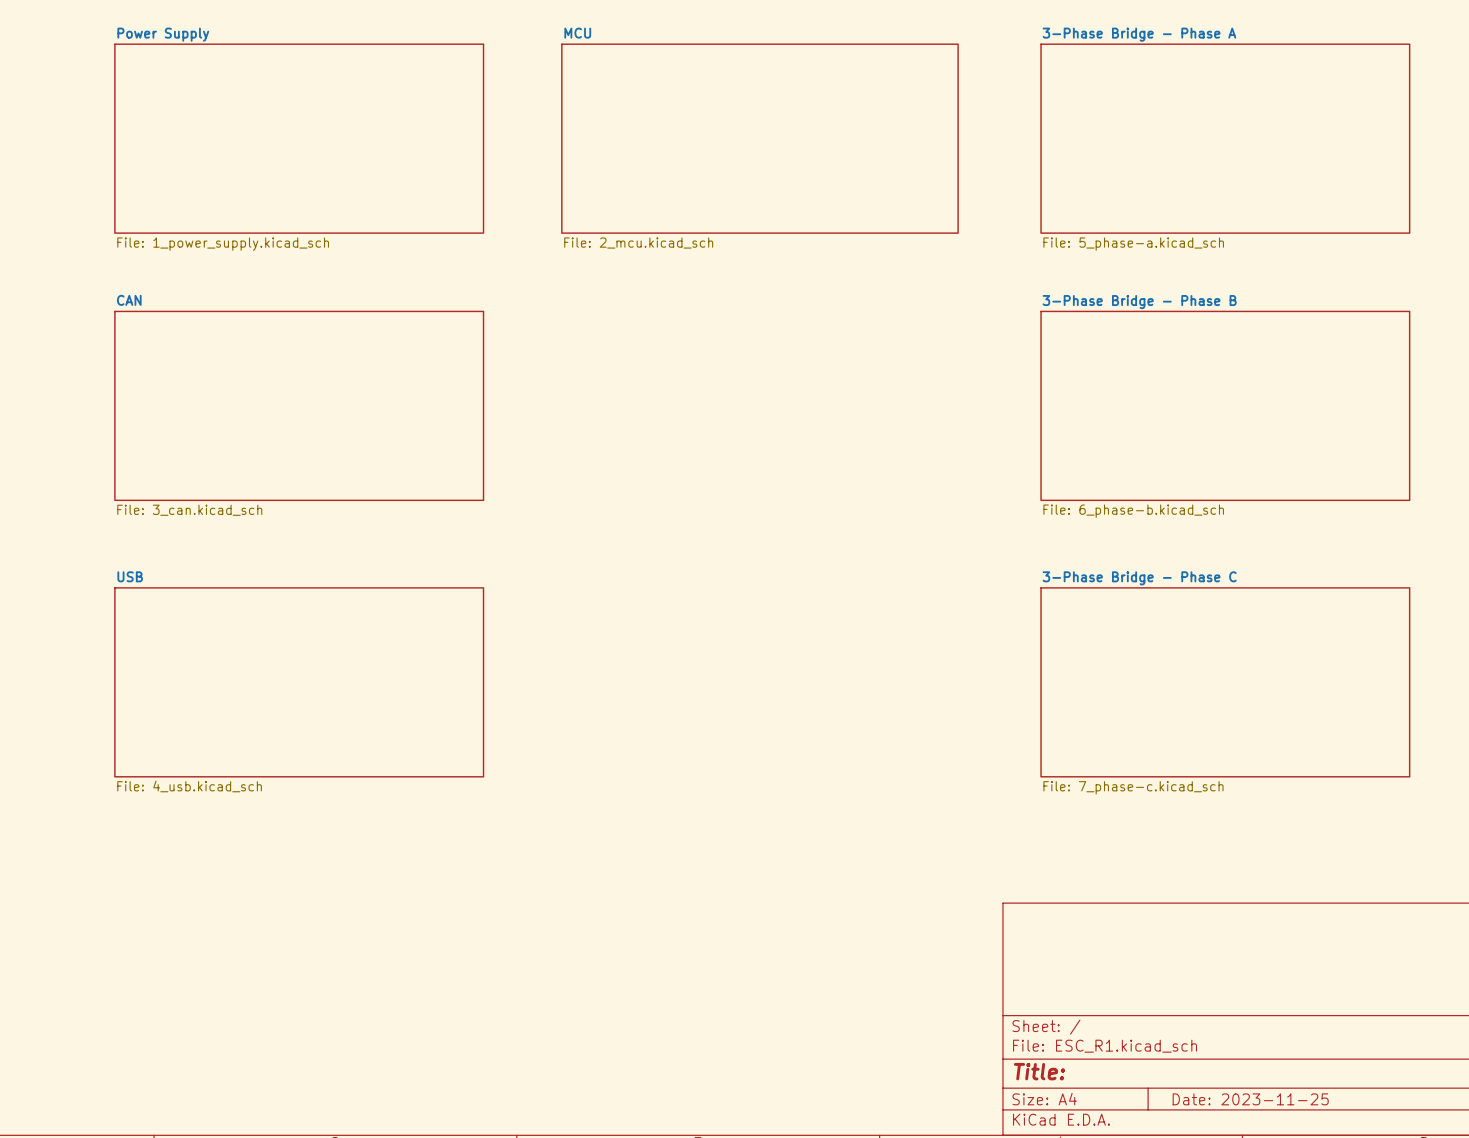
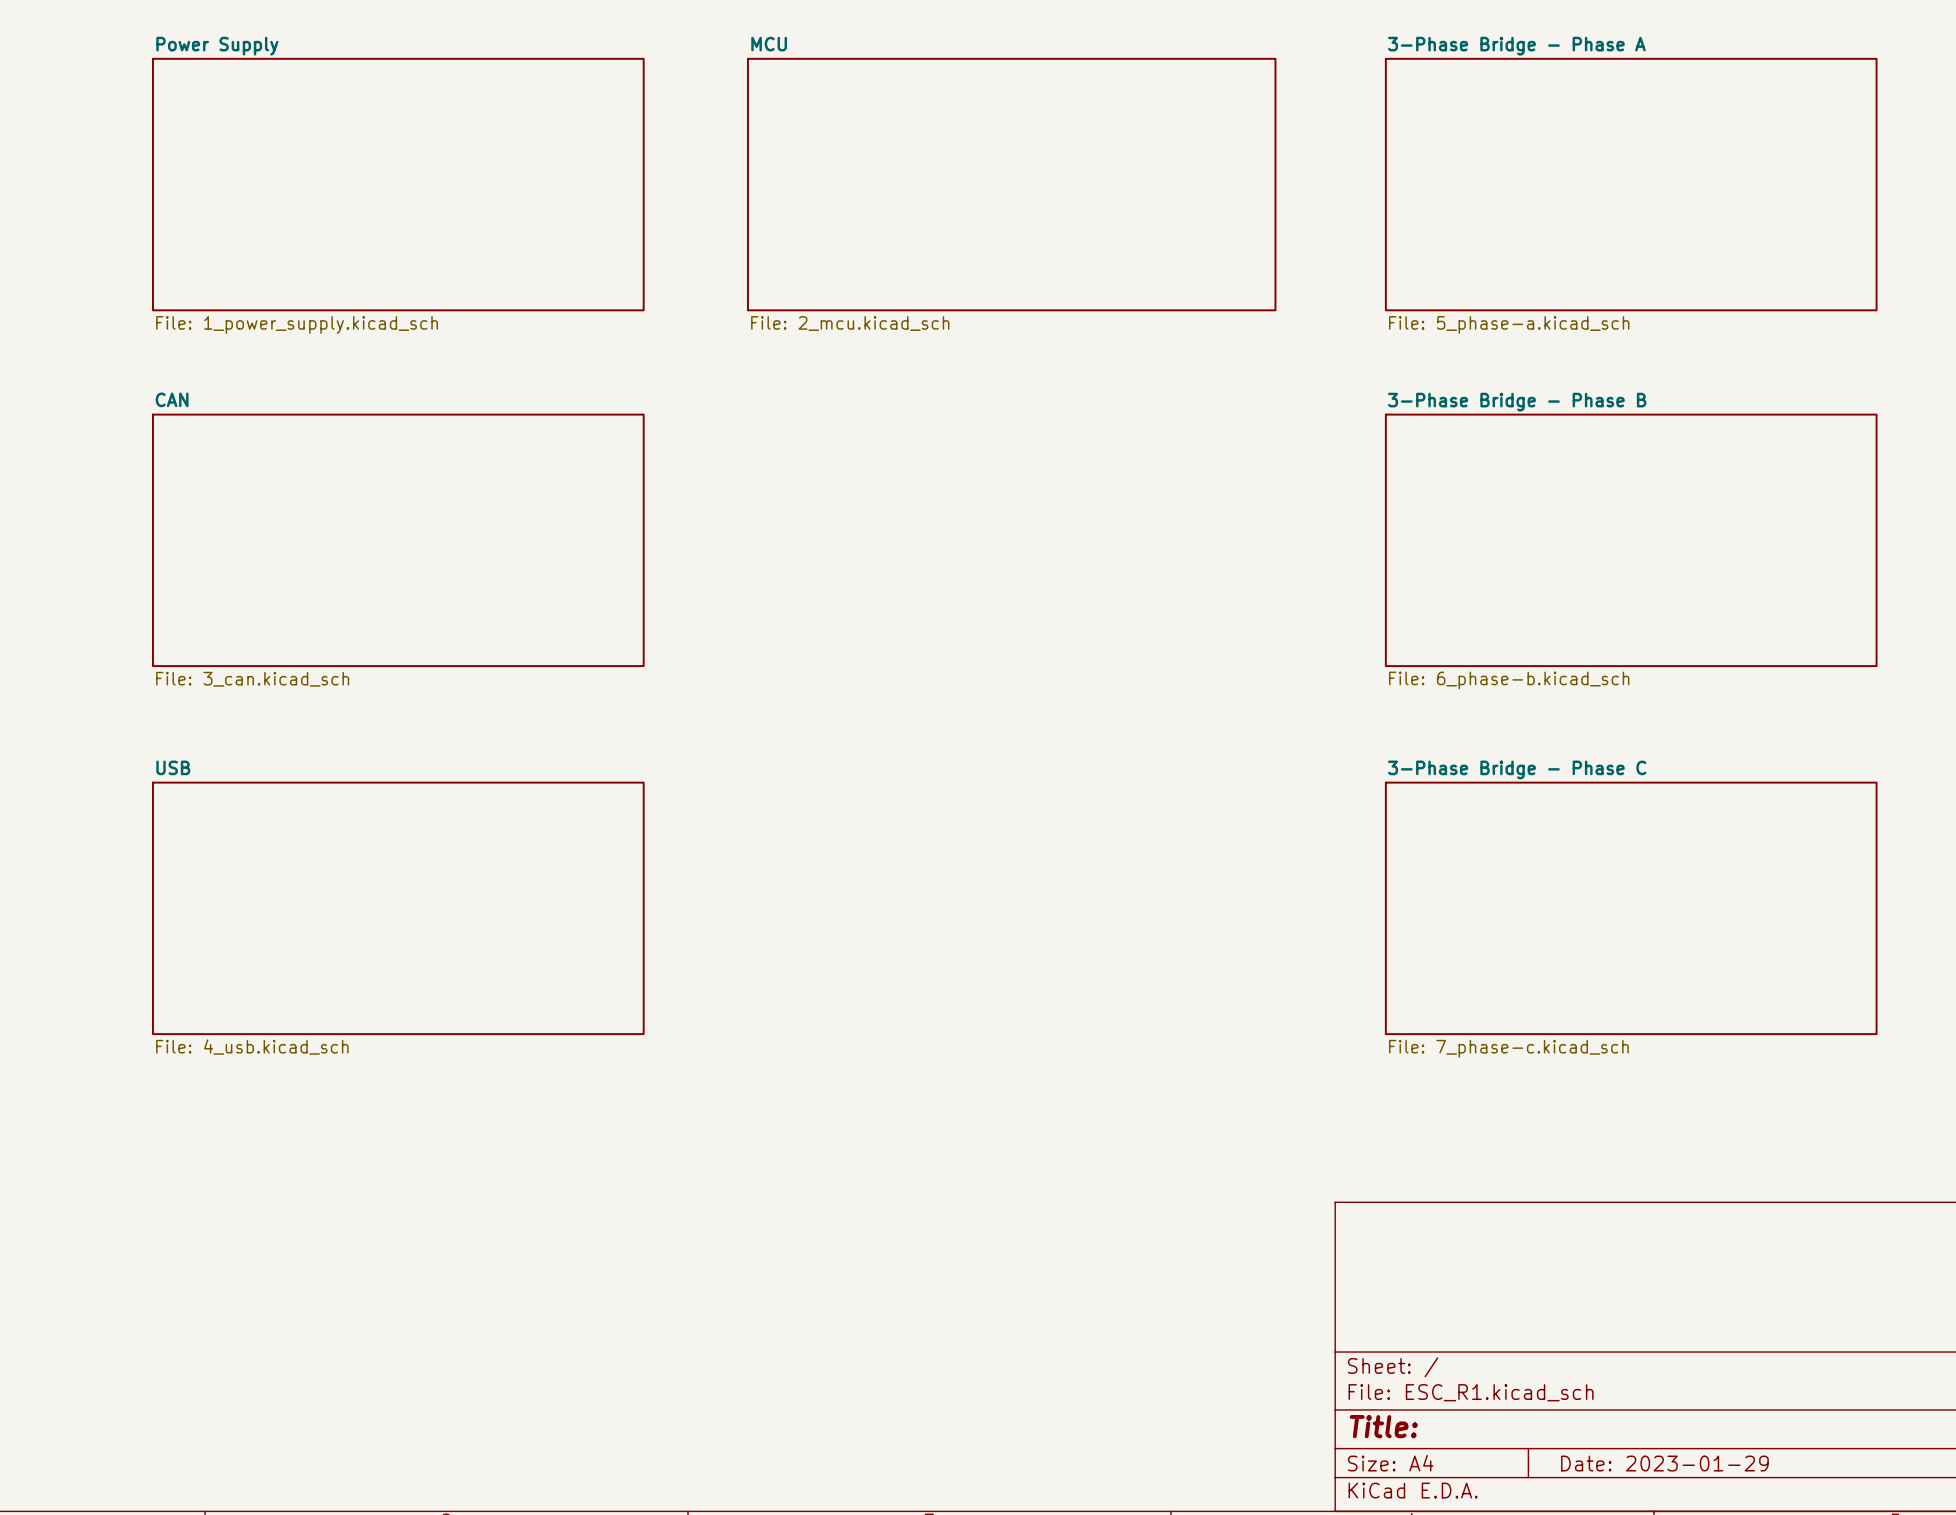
title block: Date: 2023-11-25 (1250, 1099) -> Date: 2023-01-29 (1664, 1463)

